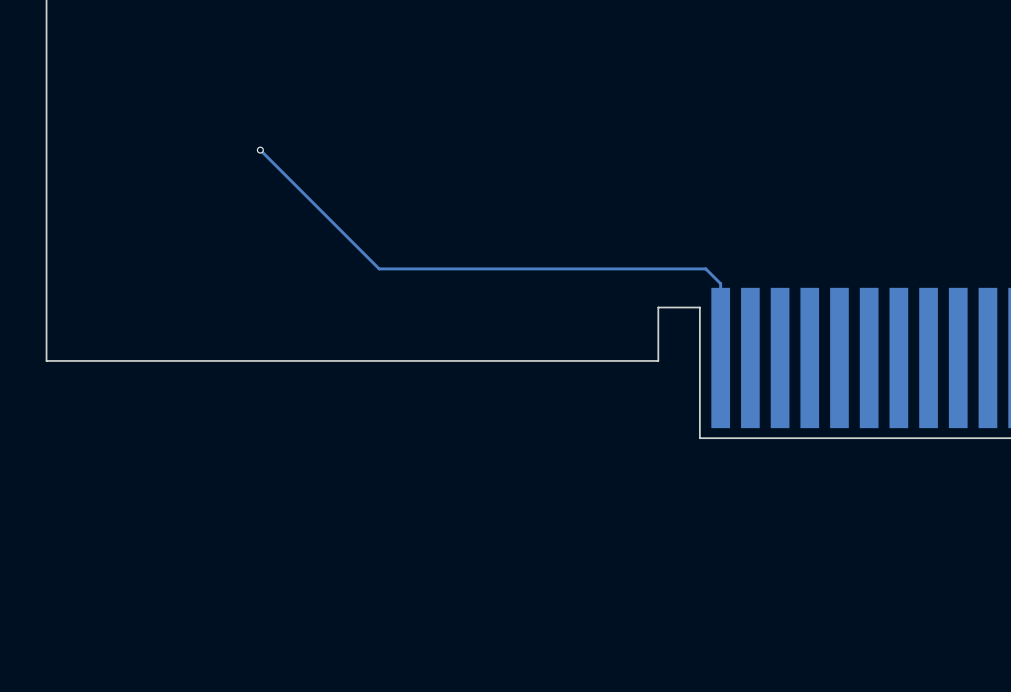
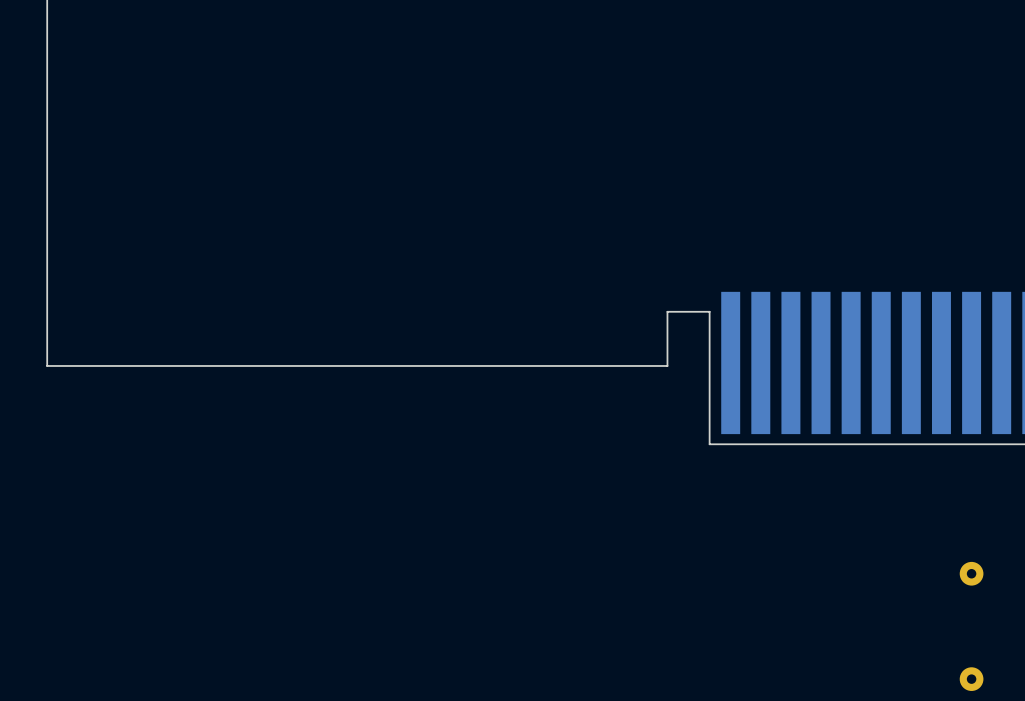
track: (260, 150) (379, 268) (705, 268) (720, 283) (720, 358) -> none
via: (260, 150) -> none
part: none -> (971, 573)
part: none -> (971, 679)

